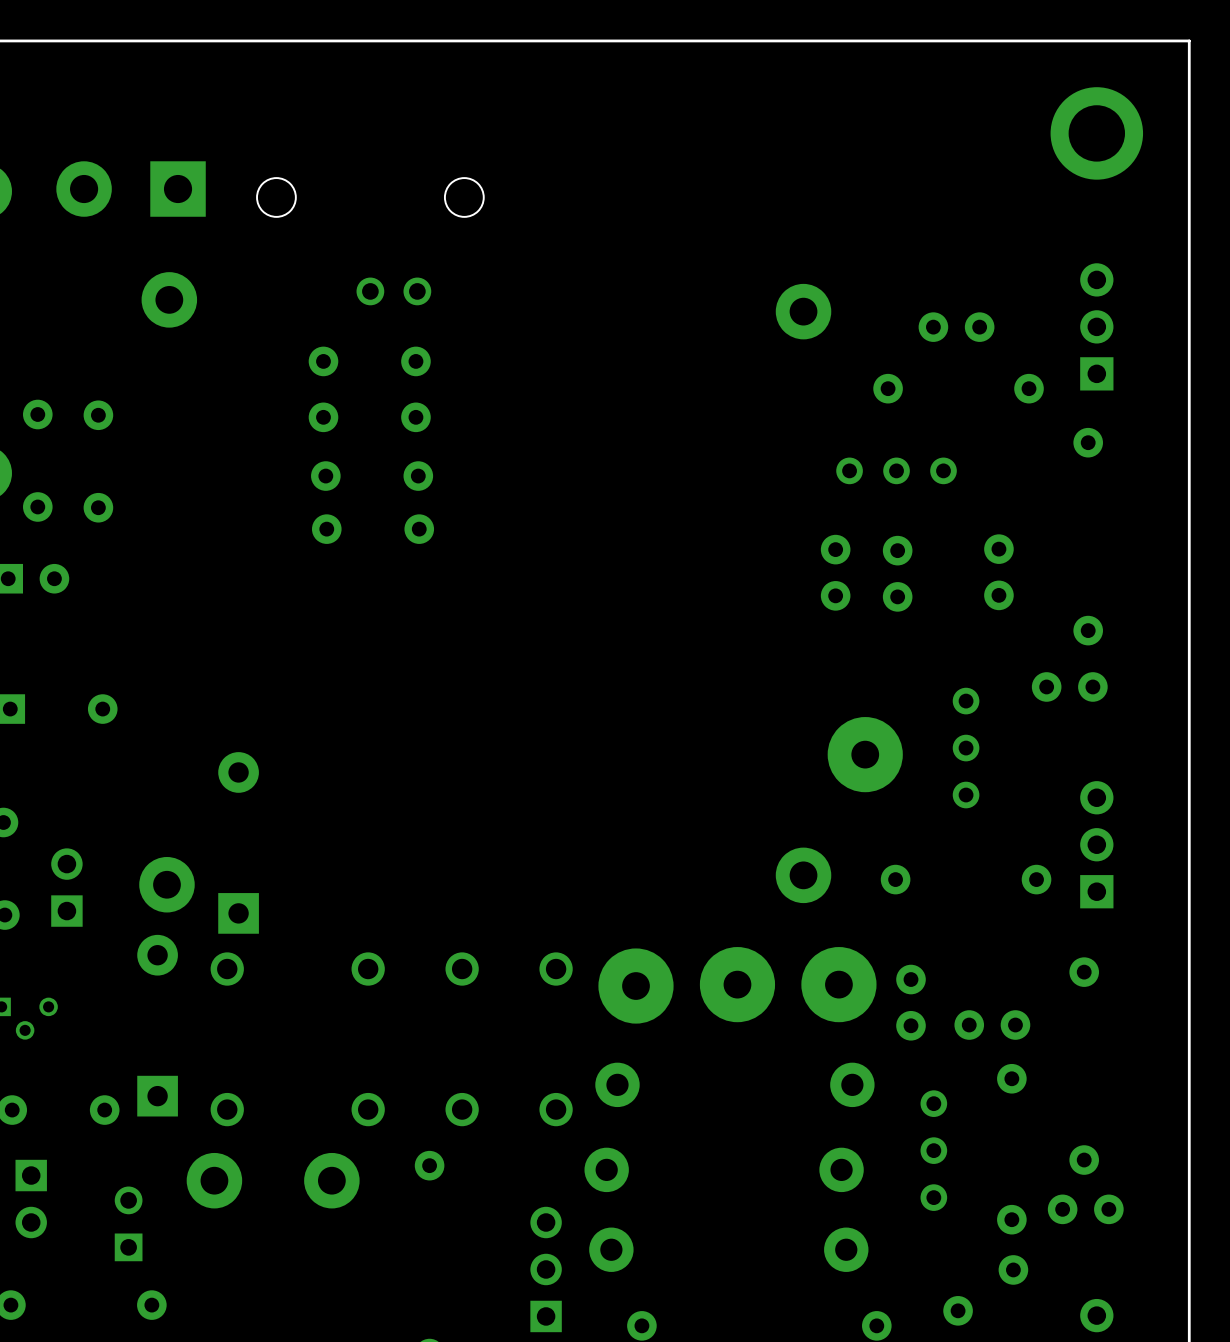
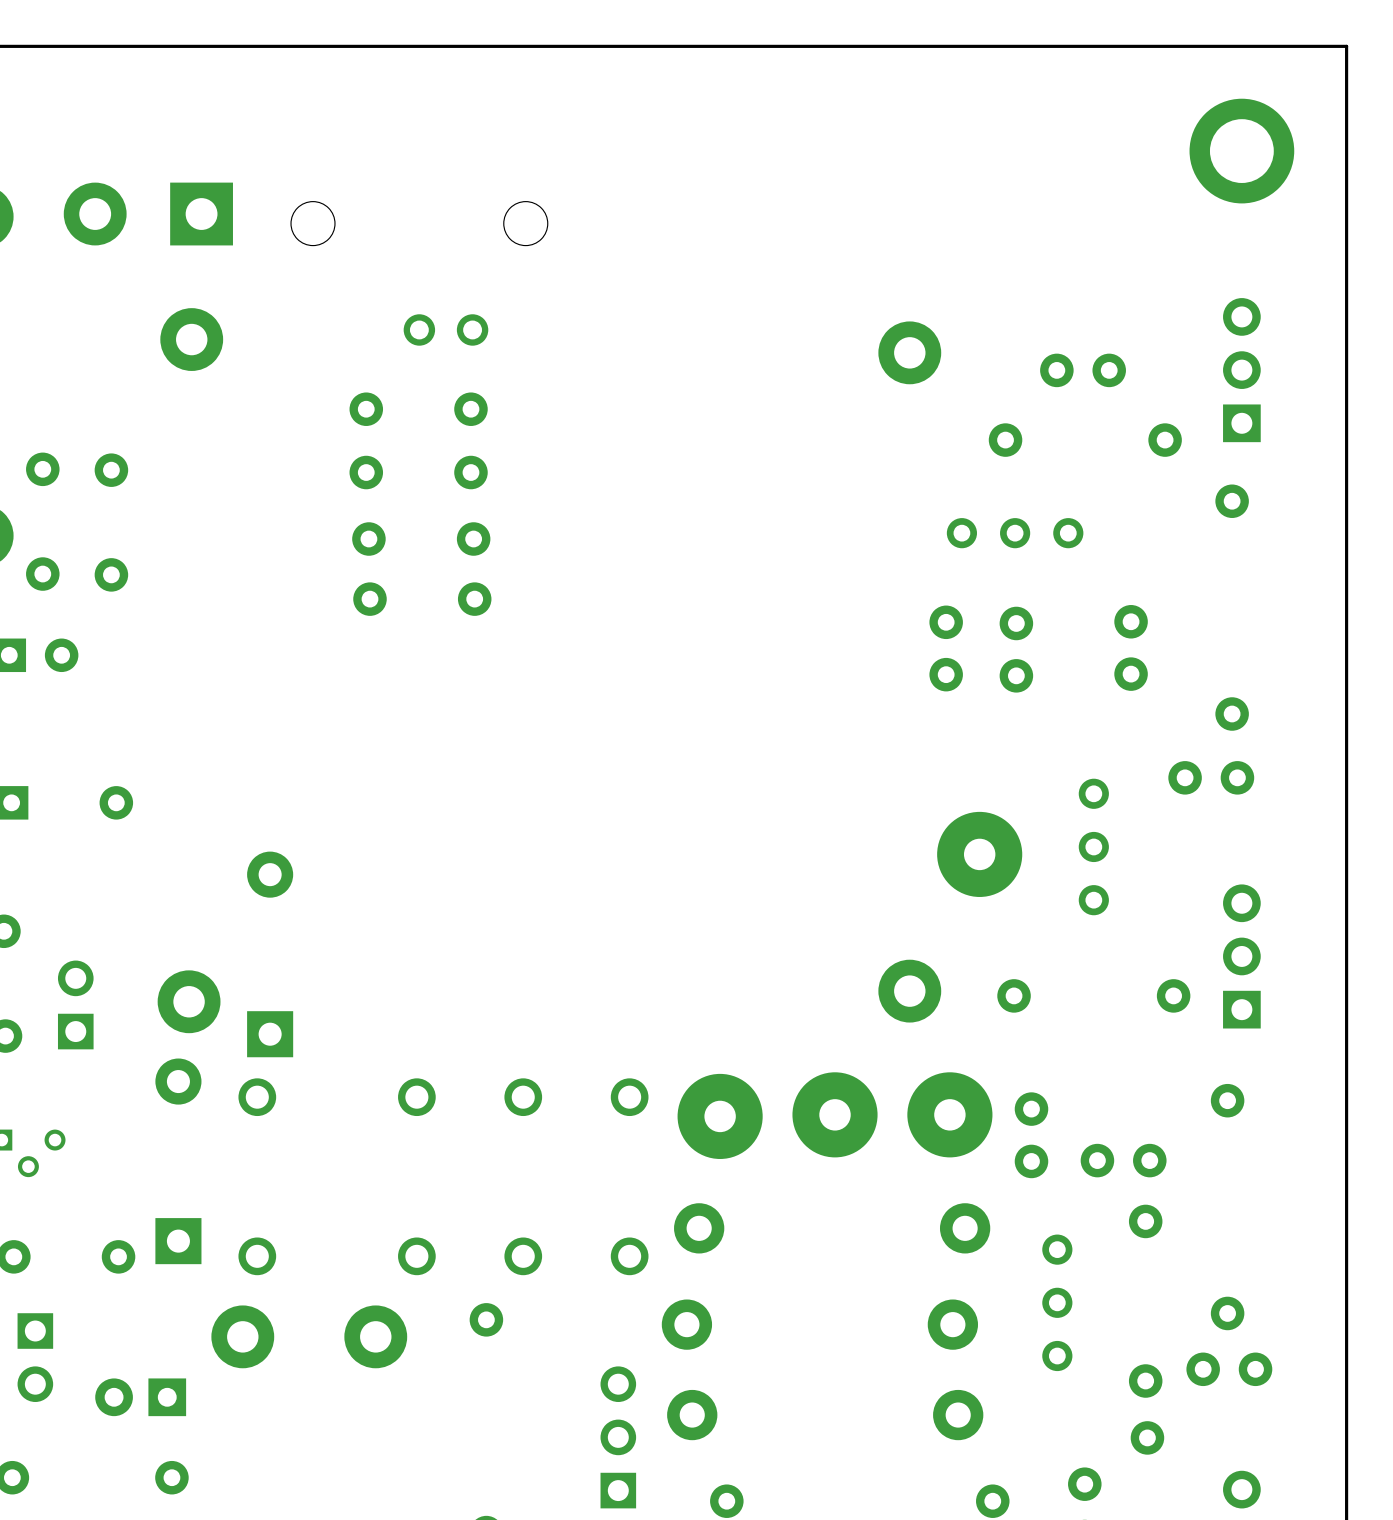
part footprint: [114, 1186, 143, 1262] -> [95, 1378, 187, 1417]

